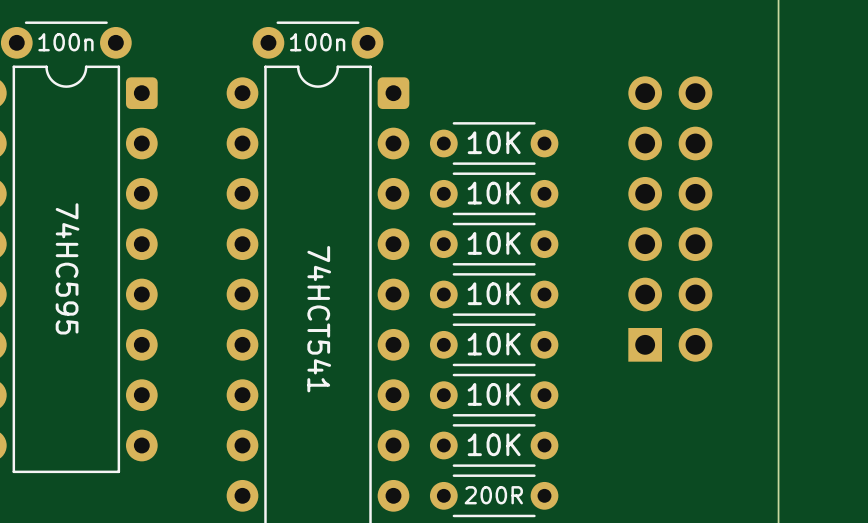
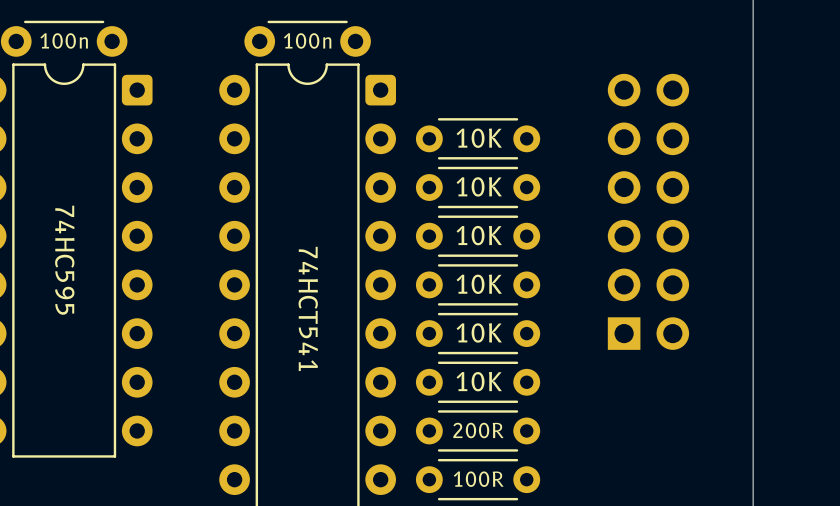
text: 10K (494, 444) -> 200R (478, 430)
text: 200R (493, 495) -> 100R (478, 479)

